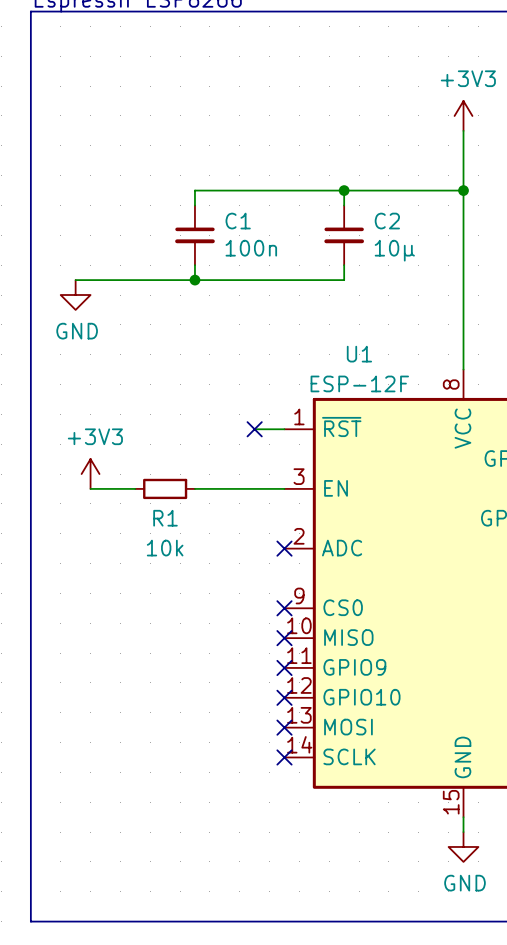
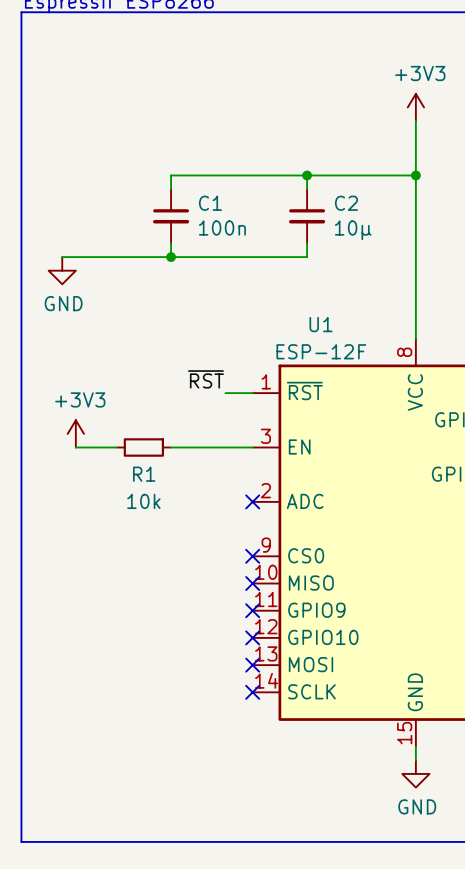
label: none -> ~{RST} (205, 379)
no-connect mark: (254, 429) -> none

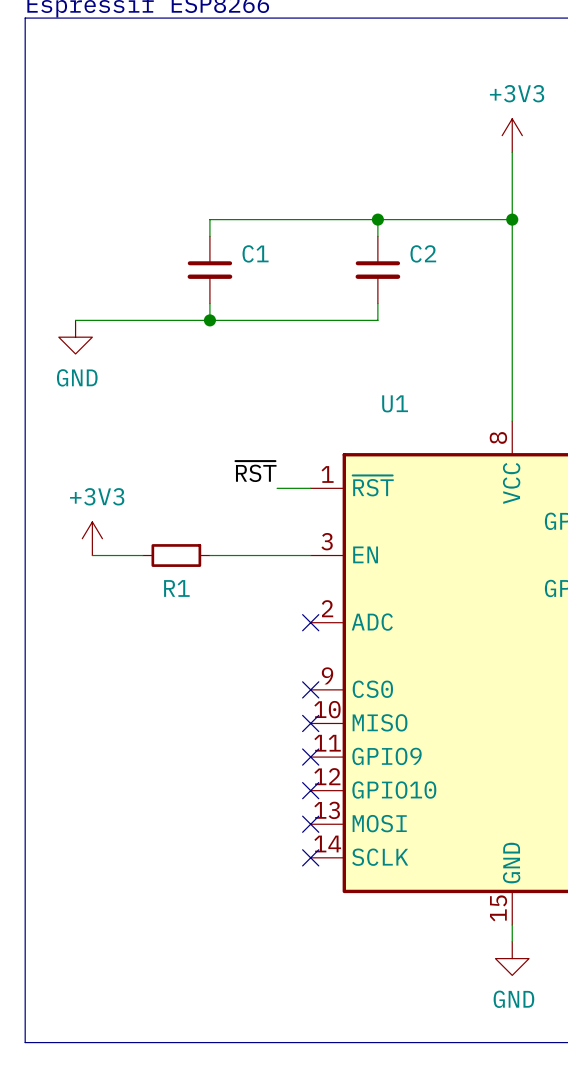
C1 value: 100n (222, 228) -> none
C2 value: 10µ (353, 230) -> none
U1 value: ESP-12F (321, 351) -> none
R1 value: 10k (143, 501) -> none

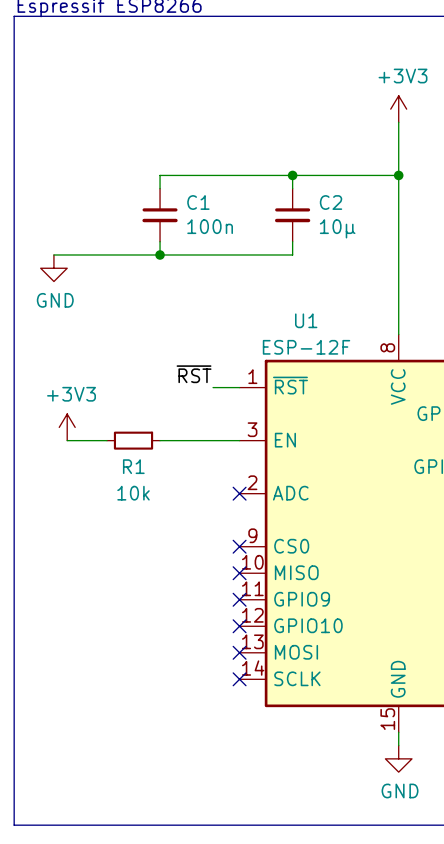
C1 value: none -> 100n (210, 226)
C2 value: none -> 10µ (337, 228)
U1 value: none -> ESP-12F (306, 347)
R1 value: none -> 10k (133, 493)

